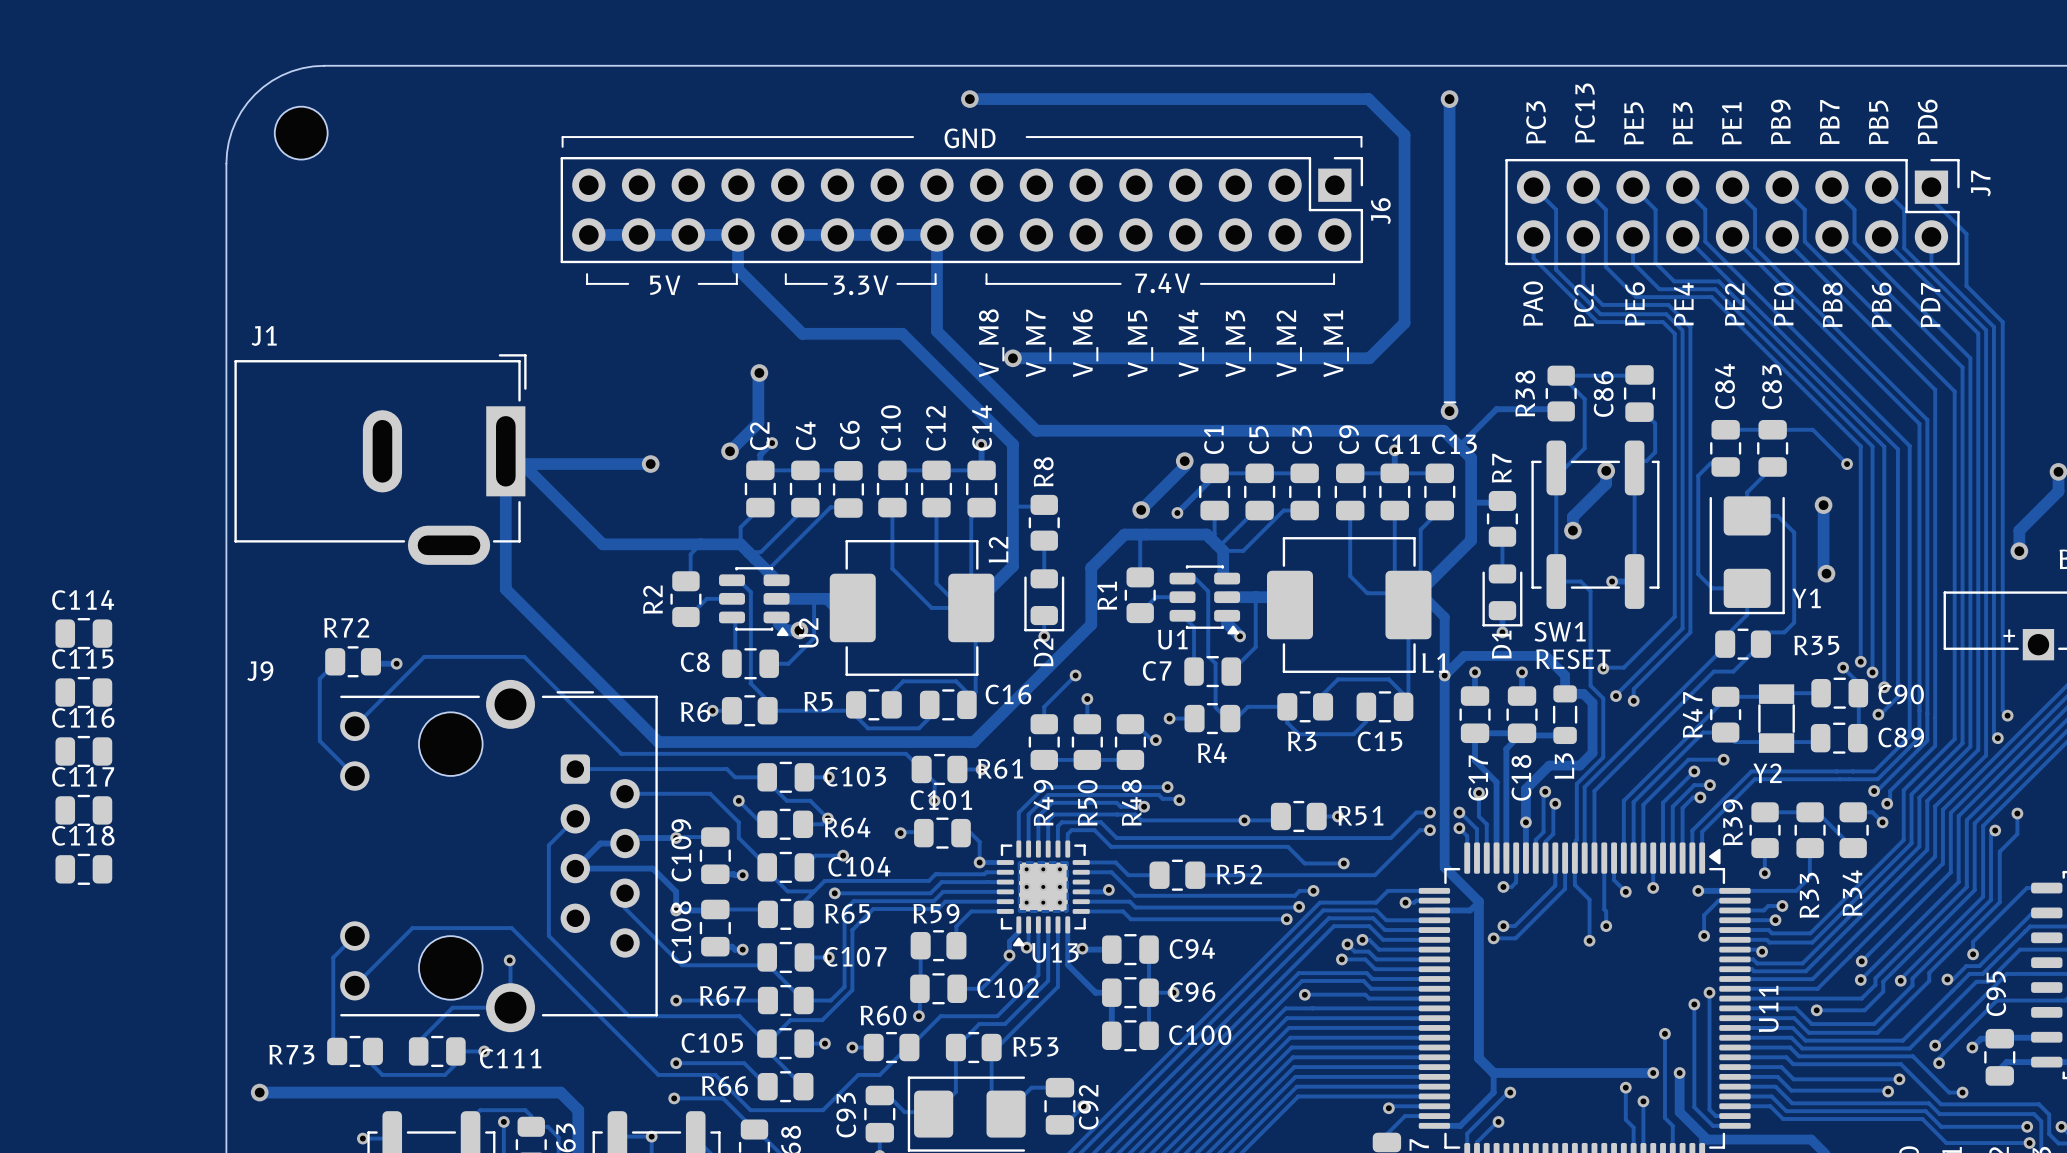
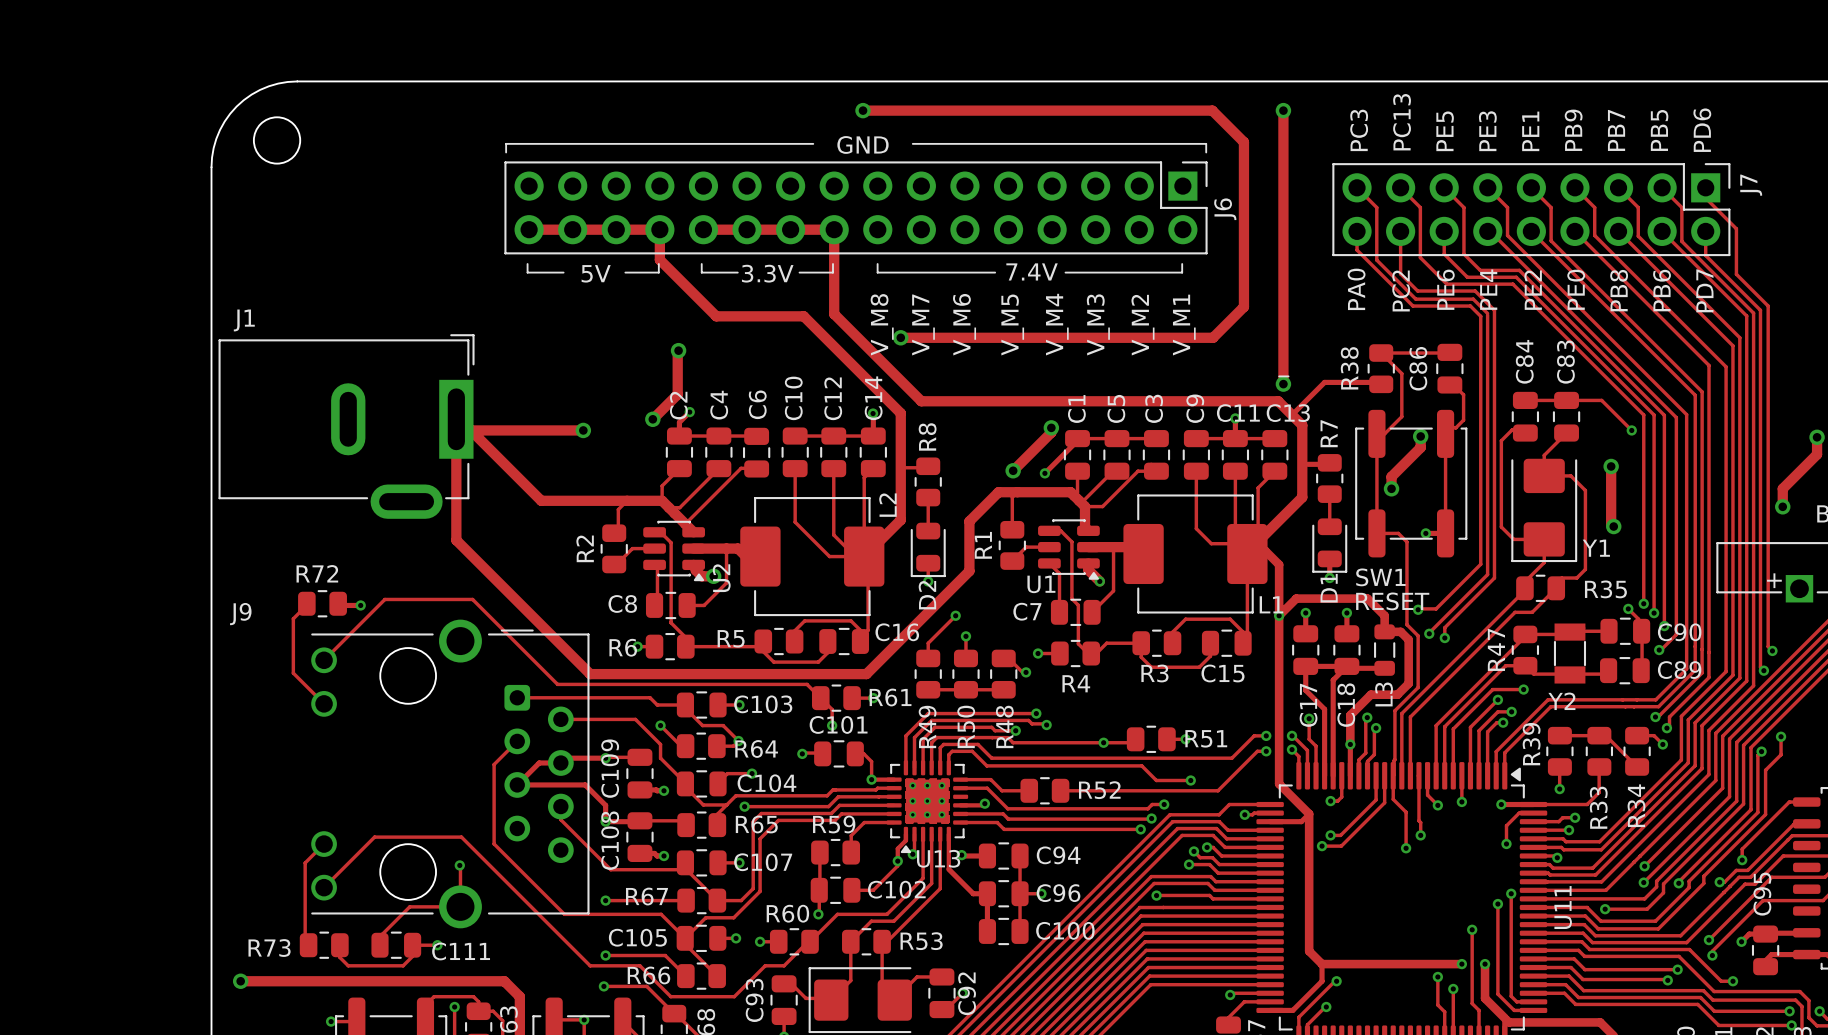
C114: (83, 633) -> none
C115: (83, 692) -> none
C116: (83, 751) -> none
C117: (83, 810) -> none
C118: (83, 869) -> none

